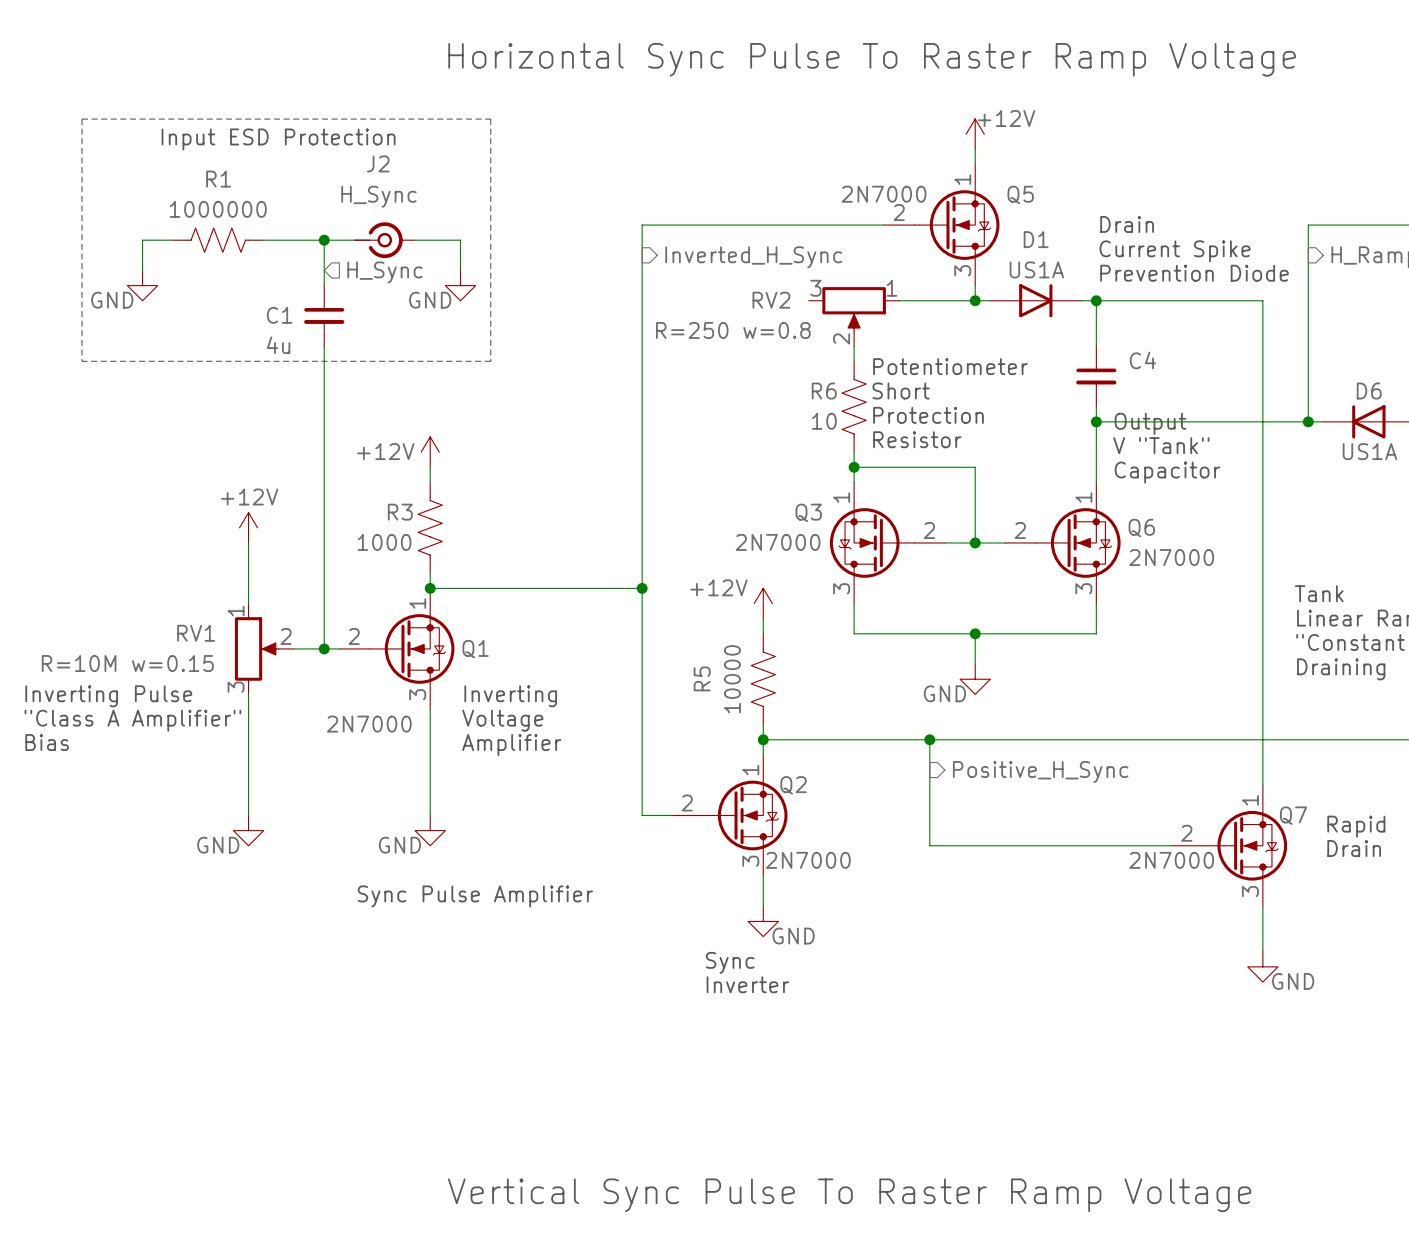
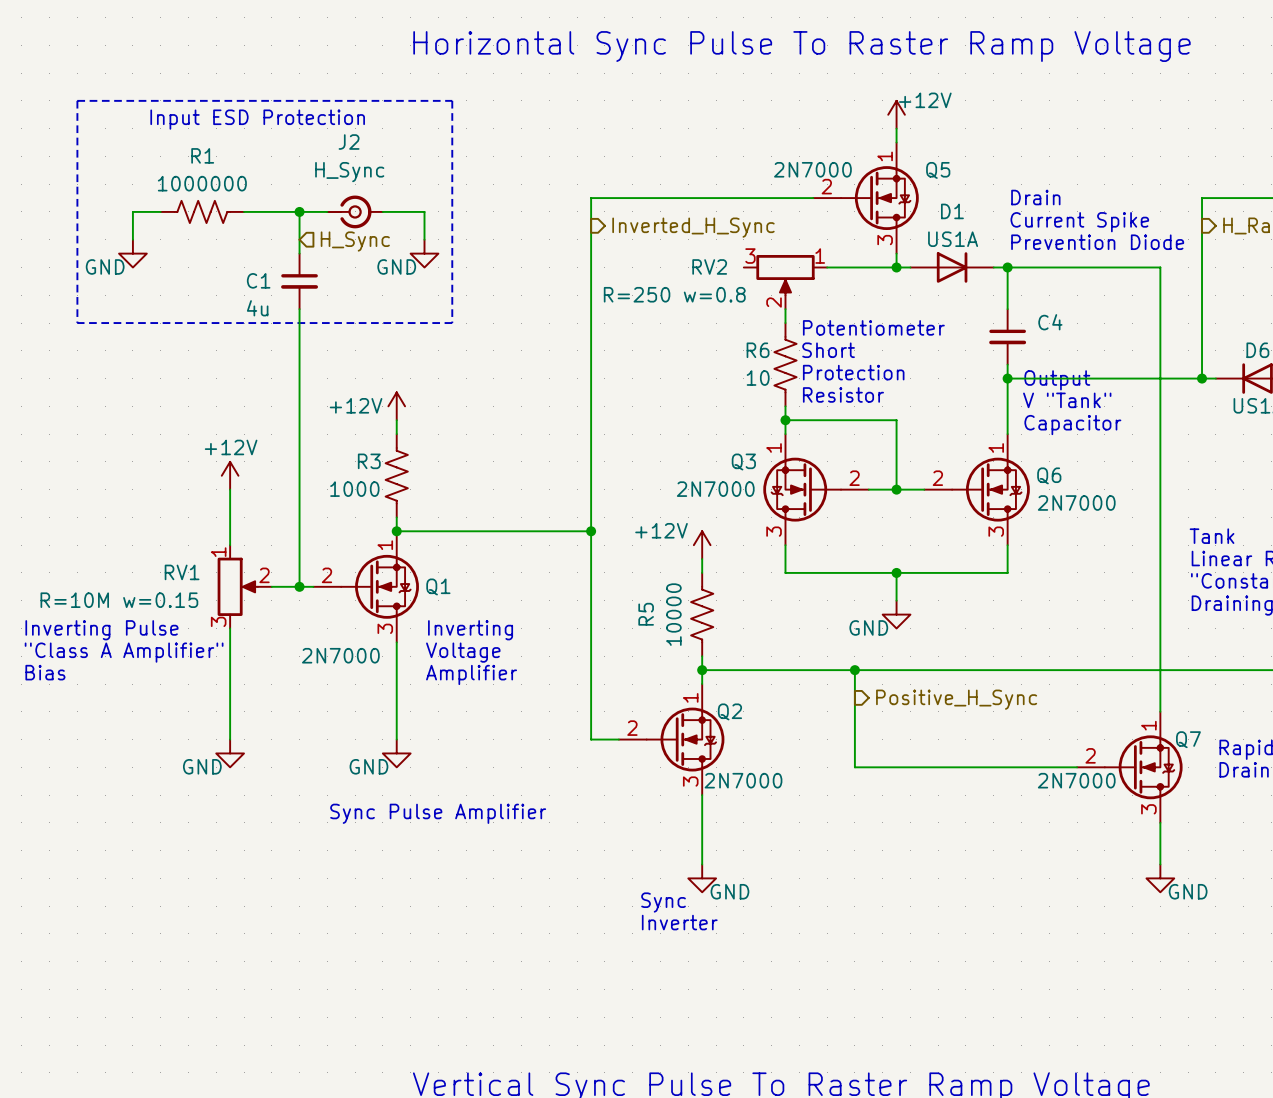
wire: none -> (702, 822) (702, 864)
power symbol position: GND (763, 921) -> GND (702, 878)
text: Sync (730, 962) -> none
text: Inverter (747, 984) -> Sync (663, 902)
text: none -> Inverter (679, 922)

